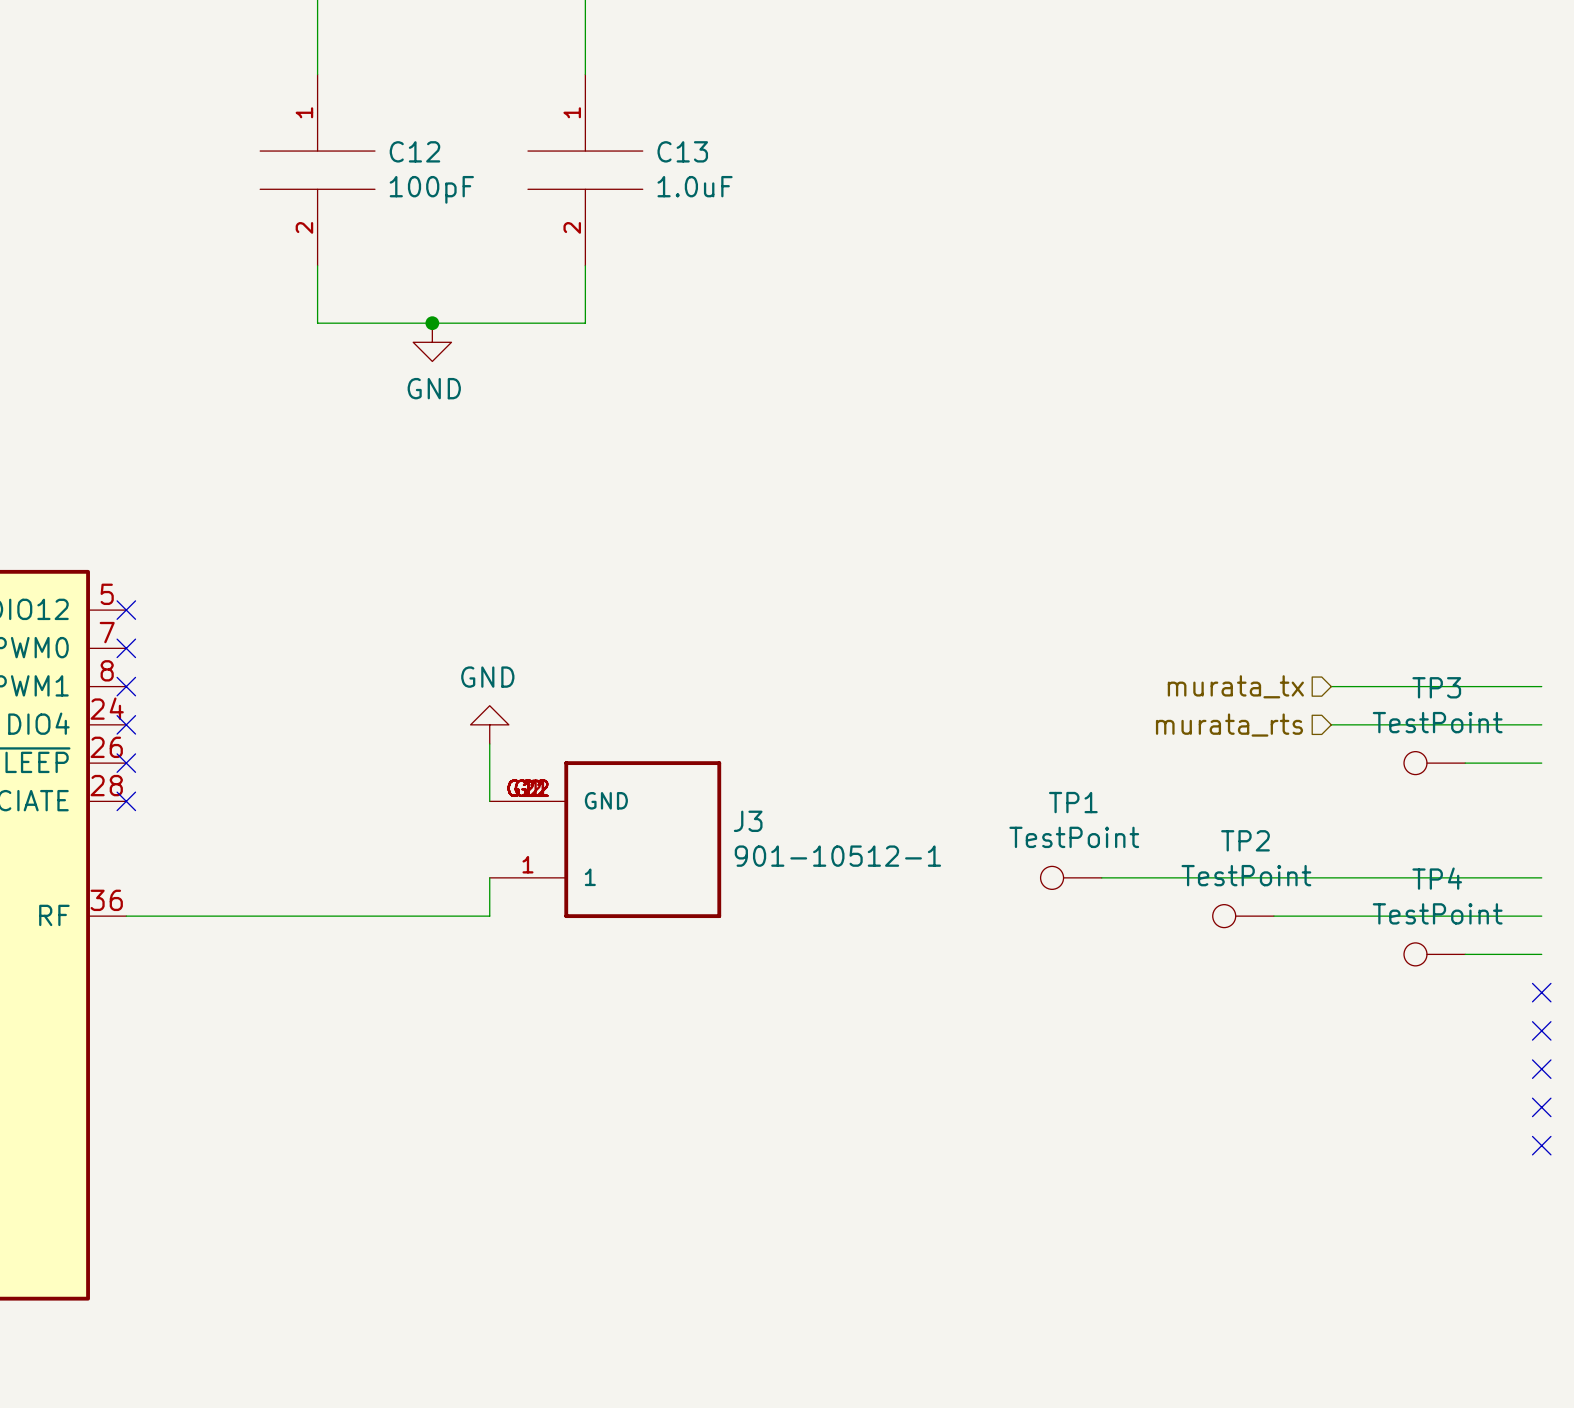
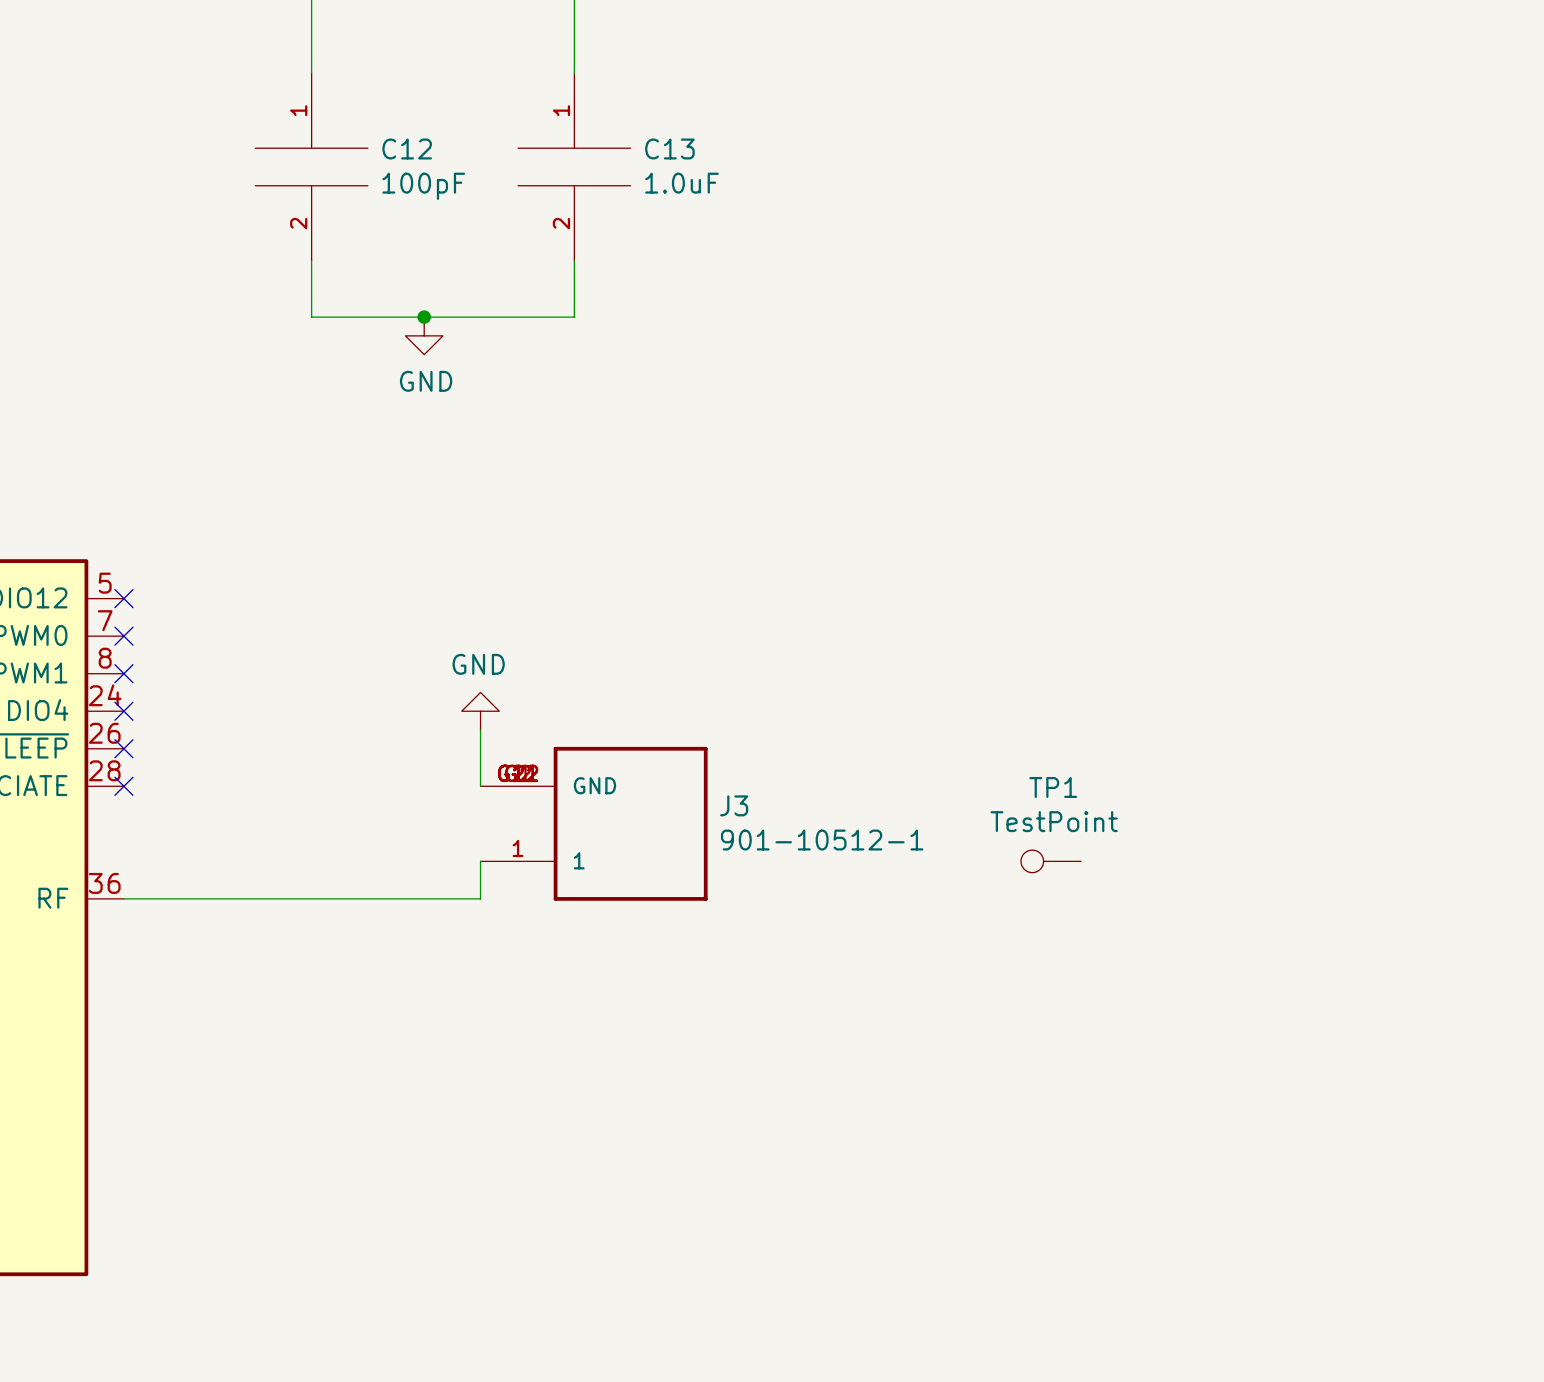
hierarchical label: murata_tx (1235, 686) -> none
wire: (1331, 686) (1541, 686) -> none
wire: (1331, 724) (1541, 724) -> none
hierarchical label: murata_rts (1229, 725) -> none
TP3: TestPoint (1434, 763) -> none
wire: (1465, 763) (1541, 763) -> none
wire: (1101, 877) (1541, 877) -> none
TP2: TestPoint (1243, 916) -> none
wire: (1273, 916) (1541, 916) -> none
TP4: TestPoint (1434, 954) -> none
wire: (1465, 954) (1541, 954) -> none
no-connect mark: (1541, 992) -> none
no-connect mark: (1541, 1030) -> none
no-connect mark: (1541, 1069) -> none
no-connect mark: (1541, 1107) -> none
no-connect mark: (1541, 1145) -> none

